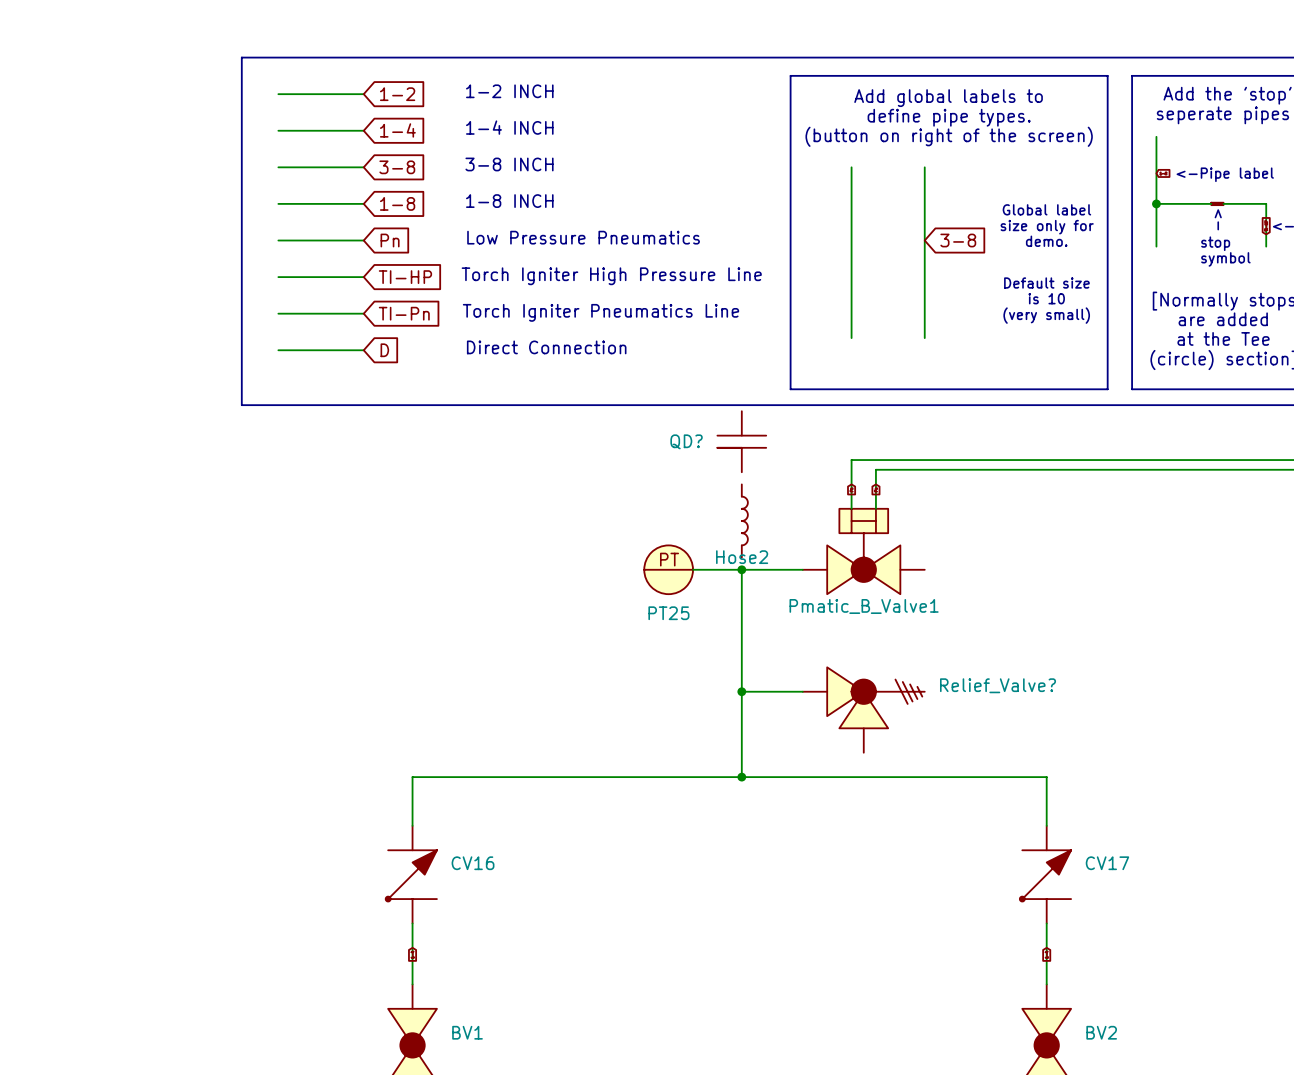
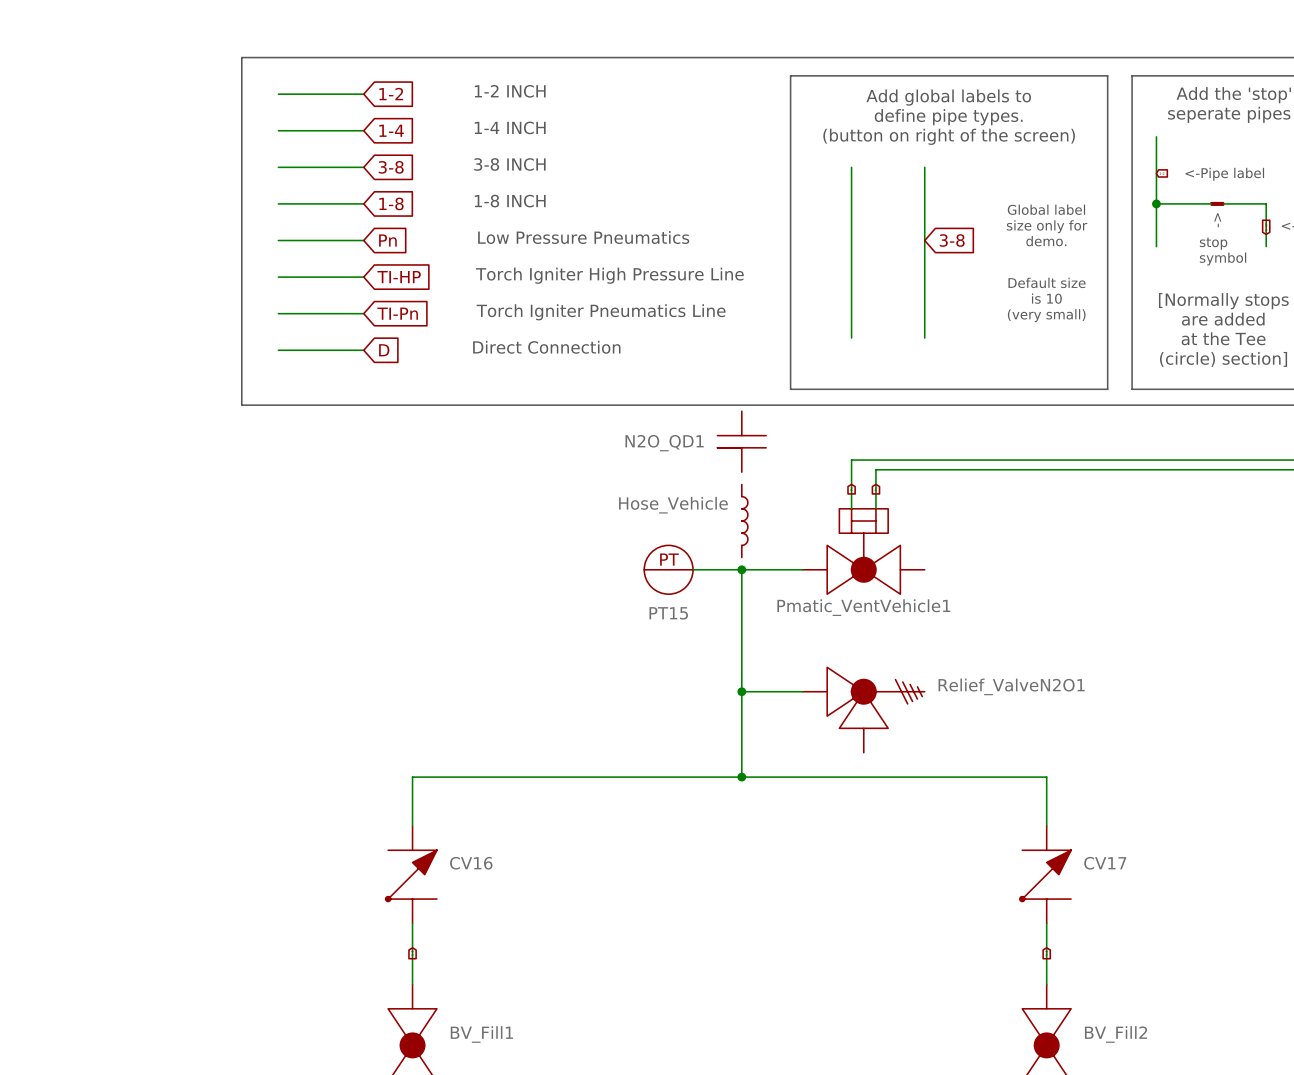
QD? name: QD? (686, 441) -> N2O_QD1 (664, 443)
BV2 value: none -> Hose_Vehicle (673, 505)
Hose2 name: Hose2 (742, 557) -> none
Pmatic_B_Valve1 name: Pmatic_B_Valve1 (864, 606) -> Pmatic_VentVehicle1 (863, 607)
PT25 name: PT25 (668, 613) -> PT15 (668, 613)
Relief_Valve? name: Relief_Valve? (998, 685) -> Relief_ValveN2O1 (1011, 686)
BV1 name: BV1 (467, 1032) -> BV_Fill1 (481, 1034)
BV2 name: BV2 (1101, 1032) -> BV_Fill2 (1116, 1034)

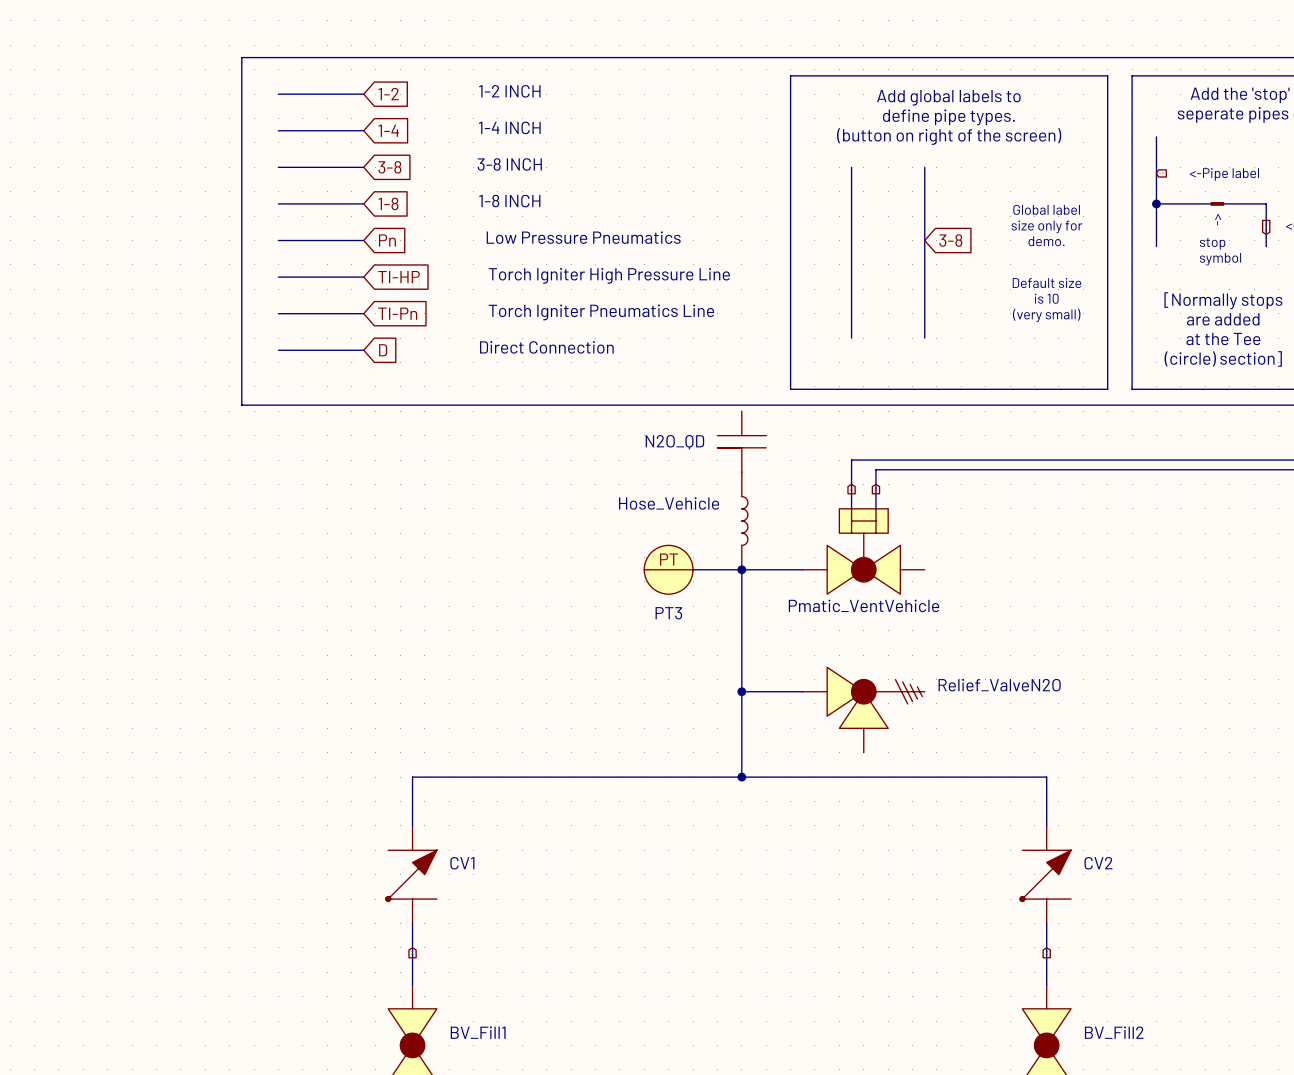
N2O_QD1 name: N2O_QD1 (664, 443) -> N2O_QD (674, 442)
part symbol: [741, 484, 748, 558] -> [741, 472, 748, 570]
Pmatic_VentVehicle1 name: Pmatic_VentVehicle1 (863, 607) -> Pmatic_VentVehicle (863, 605)
PT15 name: PT15 (668, 613) -> PT3 (668, 613)
Relief_ValveN2O1 name: Relief_ValveN2O1 (1011, 686) -> Relief_ValveN2O (999, 685)
CV16 name: CV16 (471, 863) -> CV1 (462, 863)
CV17 name: CV17 (1105, 863) -> CV2 (1098, 863)

